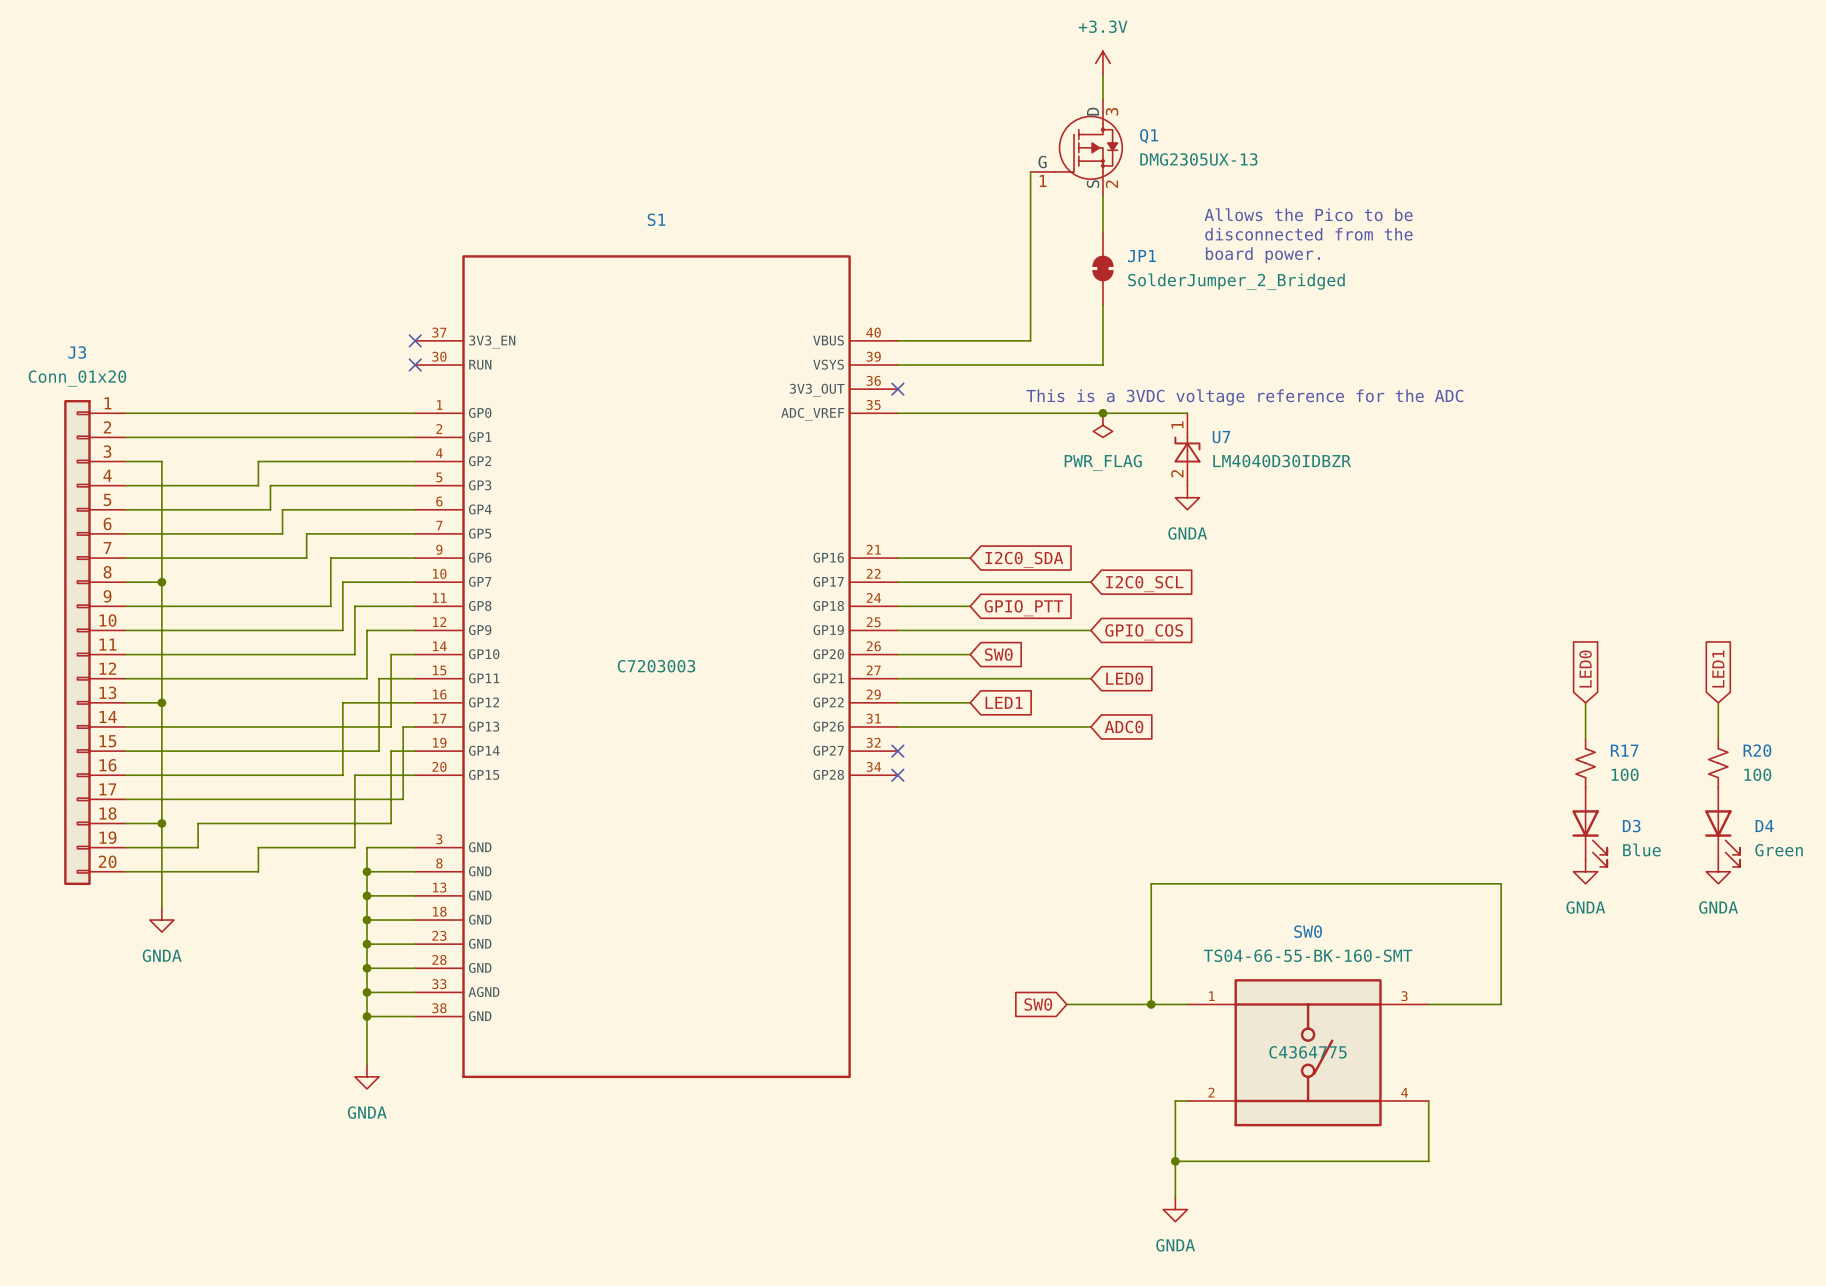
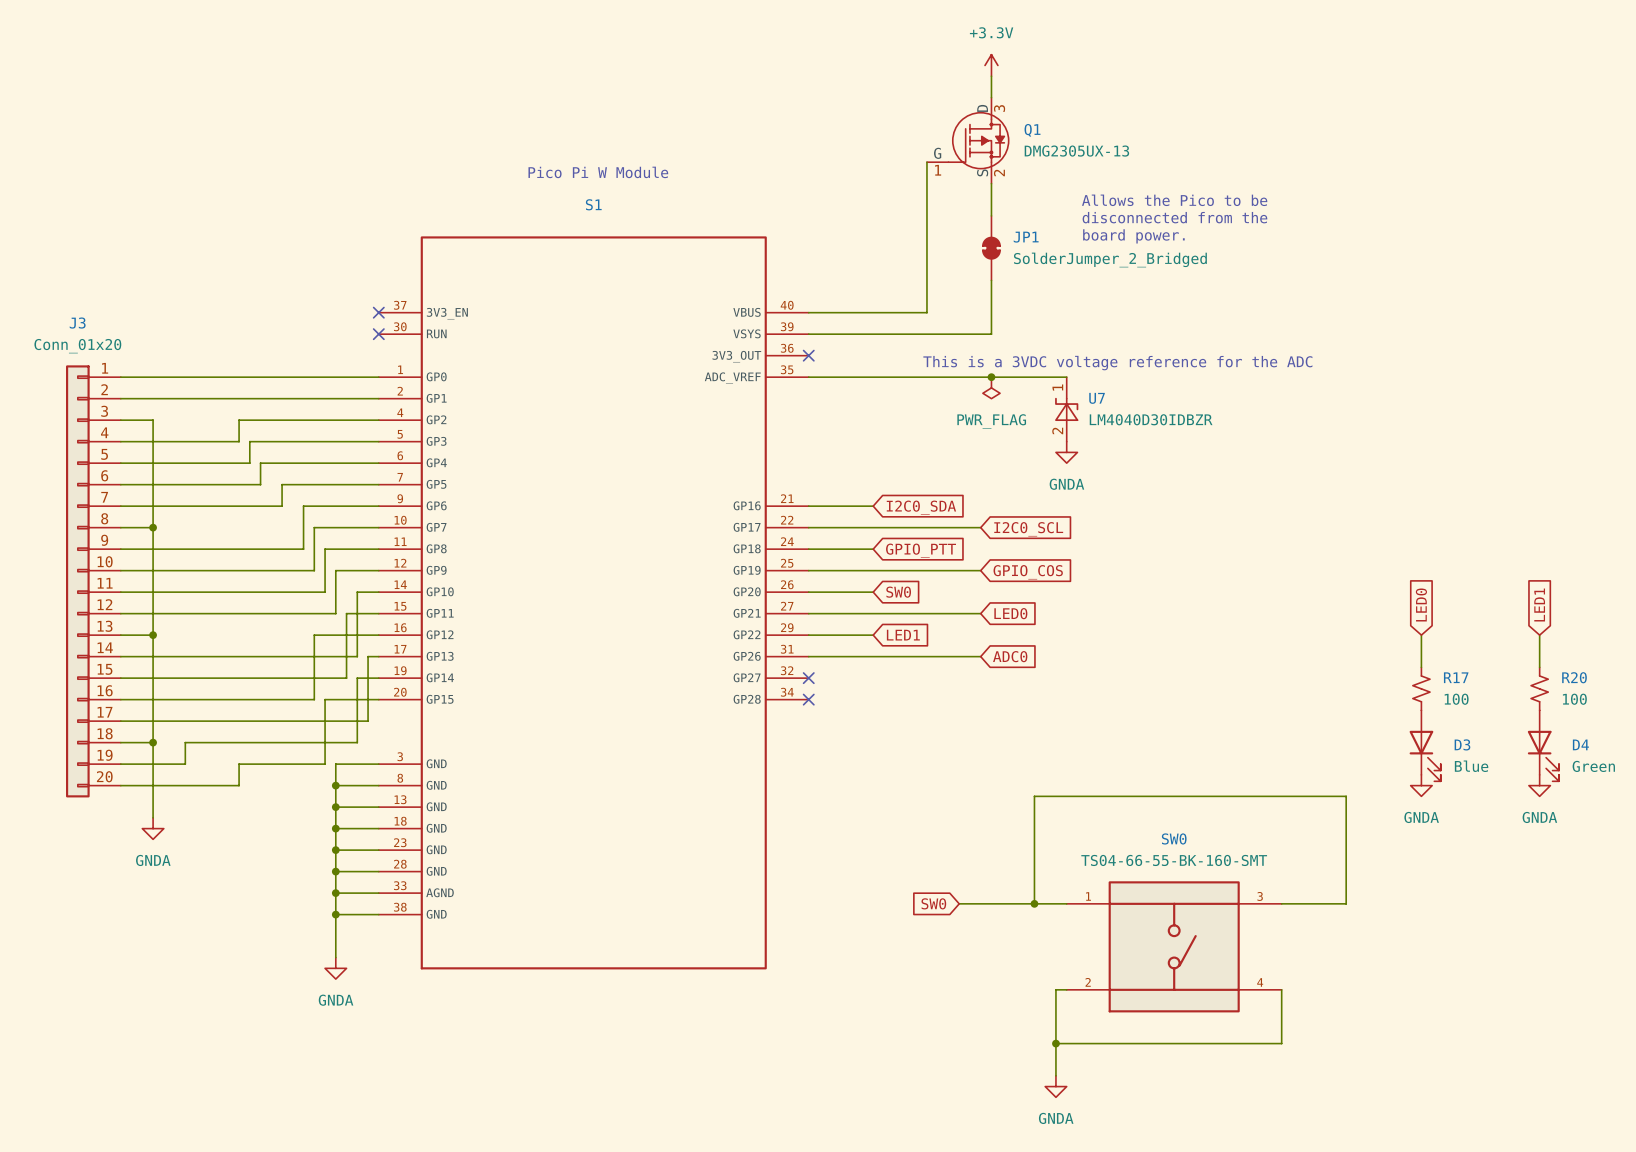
text: none -> Pico Pi W Module (598, 172)
S1 text: C7203003 (656, 666) -> none
SW0 text: C4364775 (1307, 1052) -> none

